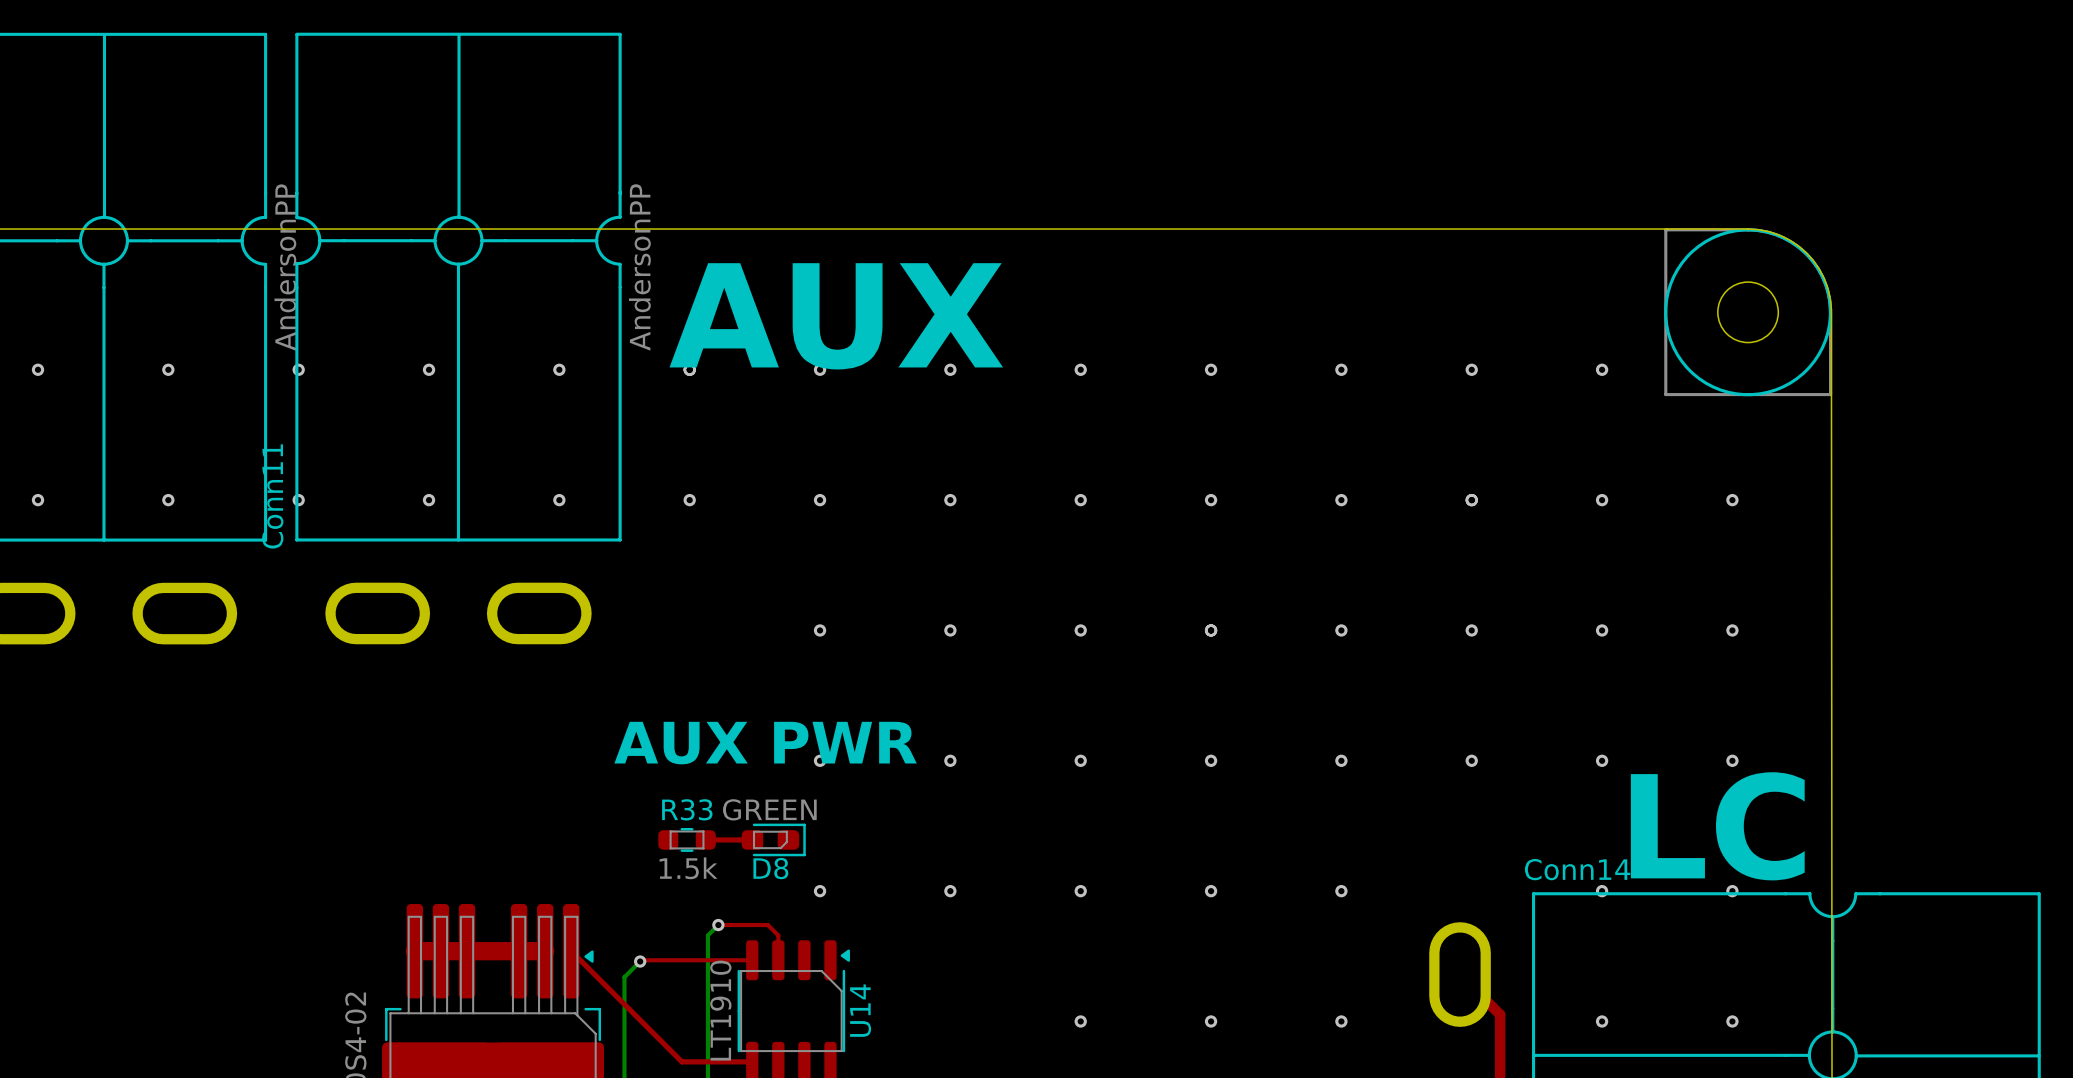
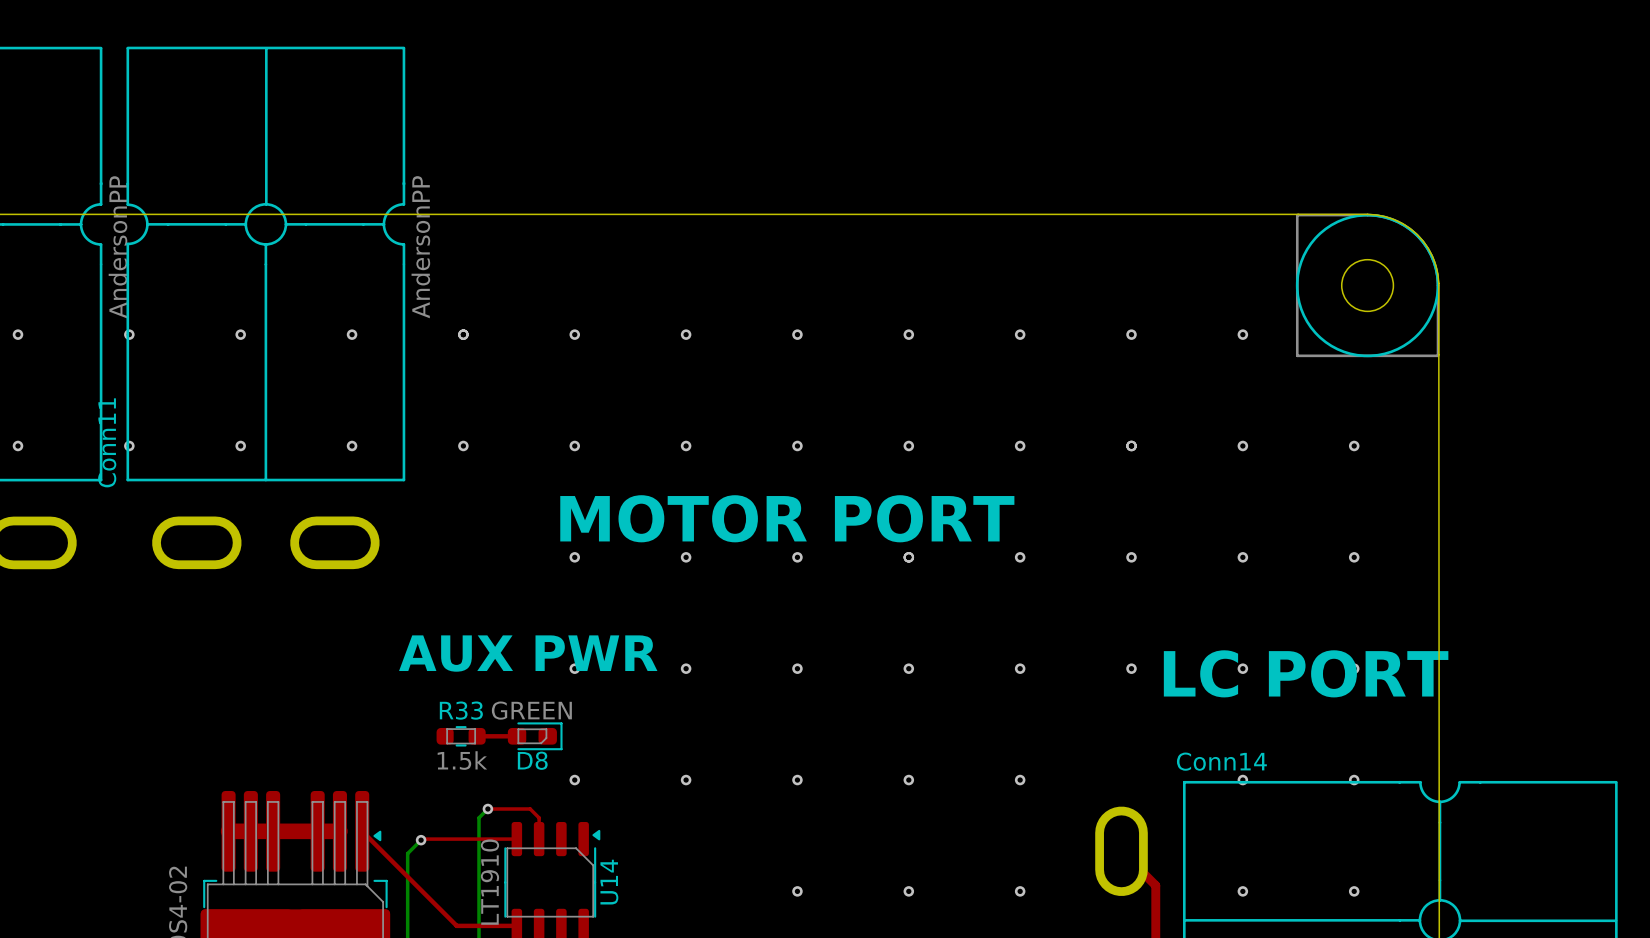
text: AUX (836, 316) -> none
text: none -> MOTOR PORT (787, 518)
text: none -> LC PORT (1306, 673)
text: LC (1717, 826) -> none

